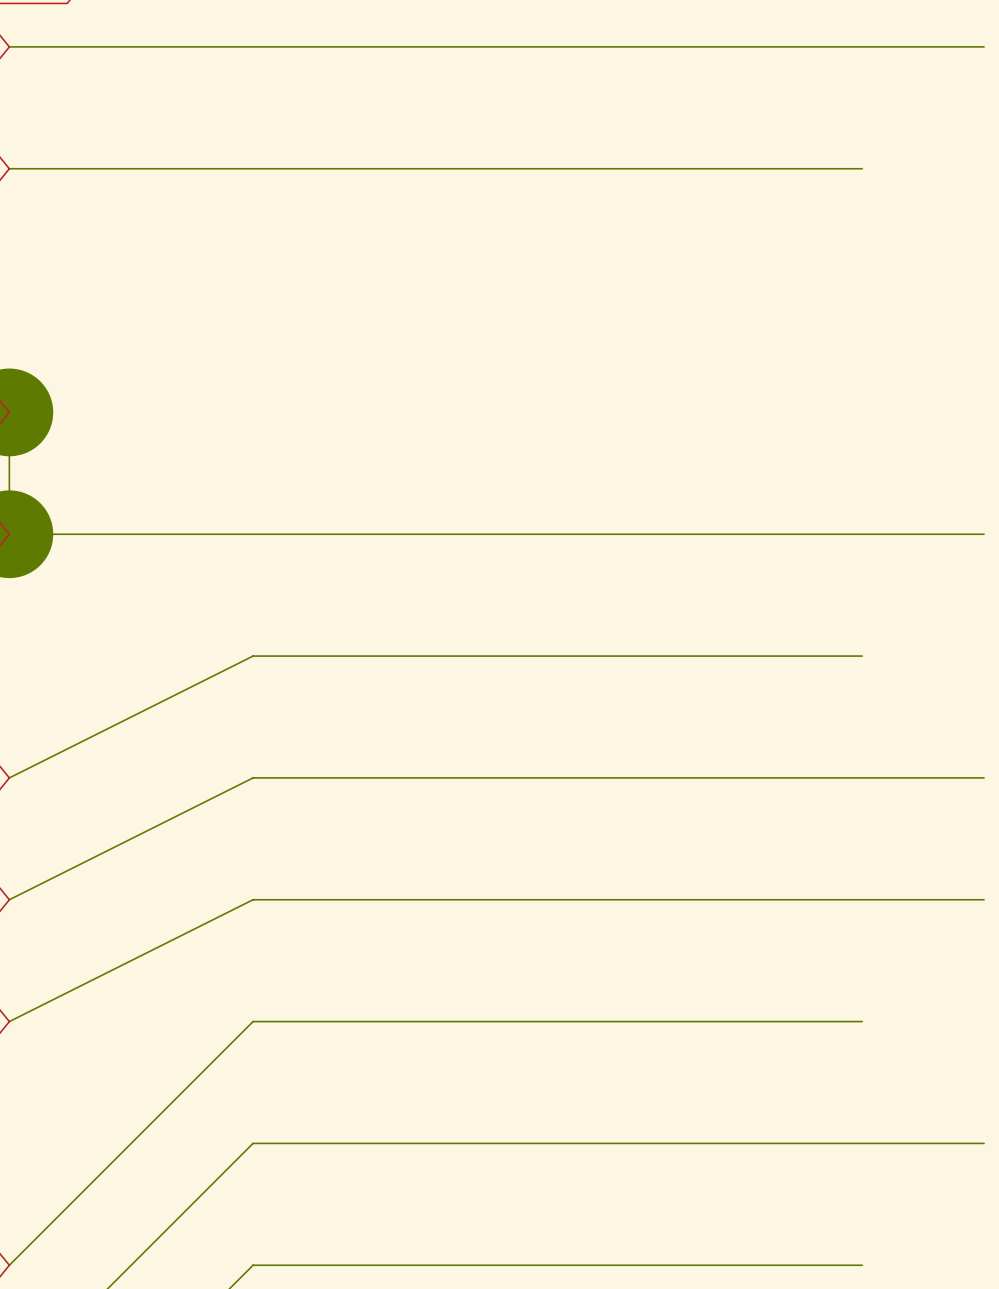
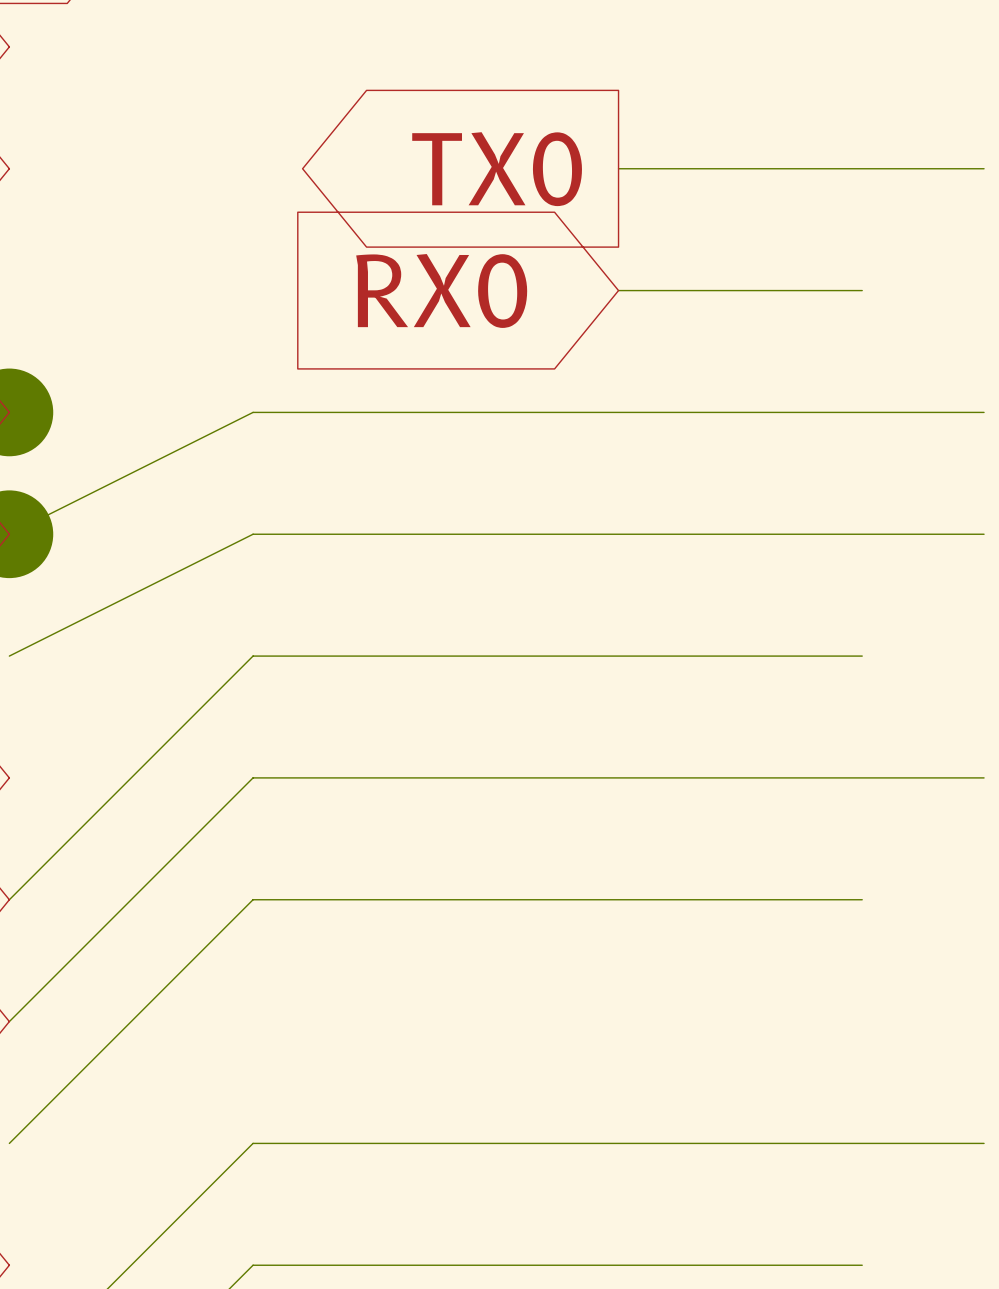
wire: (9, 46) (984, 46) -> none
wire: (9, 168) (618, 168) -> none
global label: none -> TX0 (497, 169)
global label: none -> RX0 (441, 290)
wire: none -> (618, 290) (862, 290)
wire: (9, 412) (9, 534) (253, 534) -> (9, 656) (253, 534)
wire: none -> (984, 412) (253, 412) (9, 534)
wire: (253, 656) (9, 777) -> (253, 656) (9, 899)
wire: (253, 777) (9, 899) -> none
wire: (253, 899) (9, 1021) -> (253, 777) (9, 1021)
wire: none -> (253, 899) (9, 1143)
wire: (862, 899) (984, 899) -> (862, 168) (984, 168)
wire: (862, 1021) (253, 1021) (9, 1265) -> none

